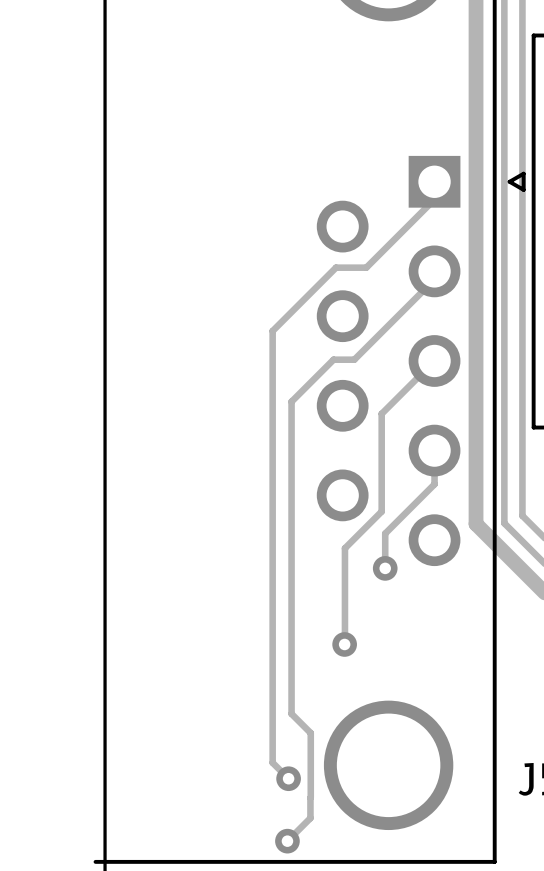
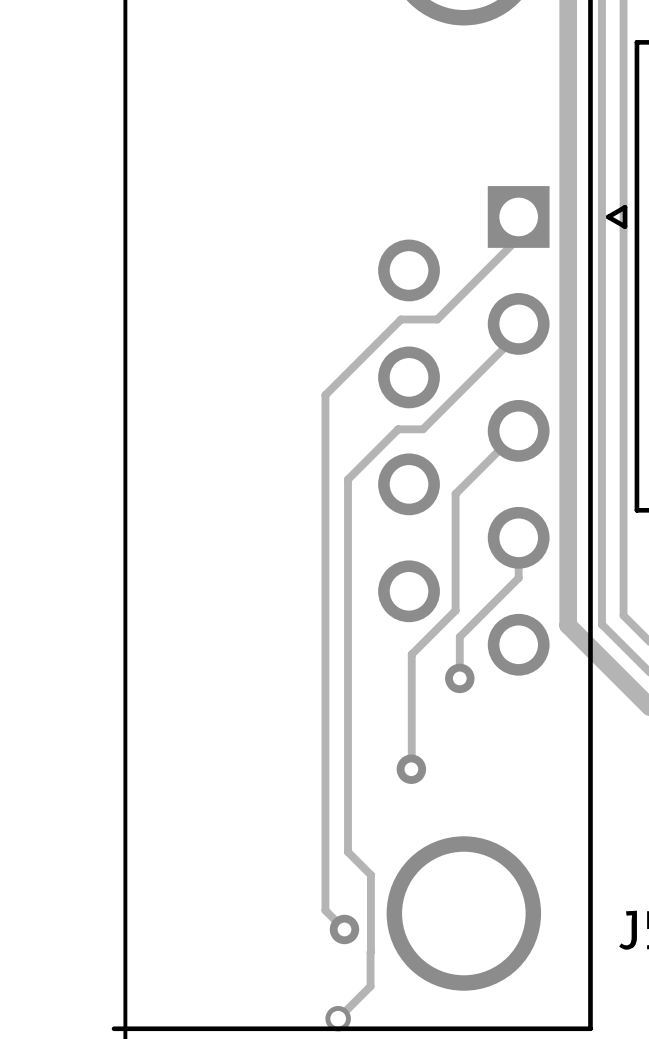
track: (310, 818) (287, 841) -> (370, 976) (370, 986) (338, 1018)
via position: (287, 841) -> (338, 1018)

